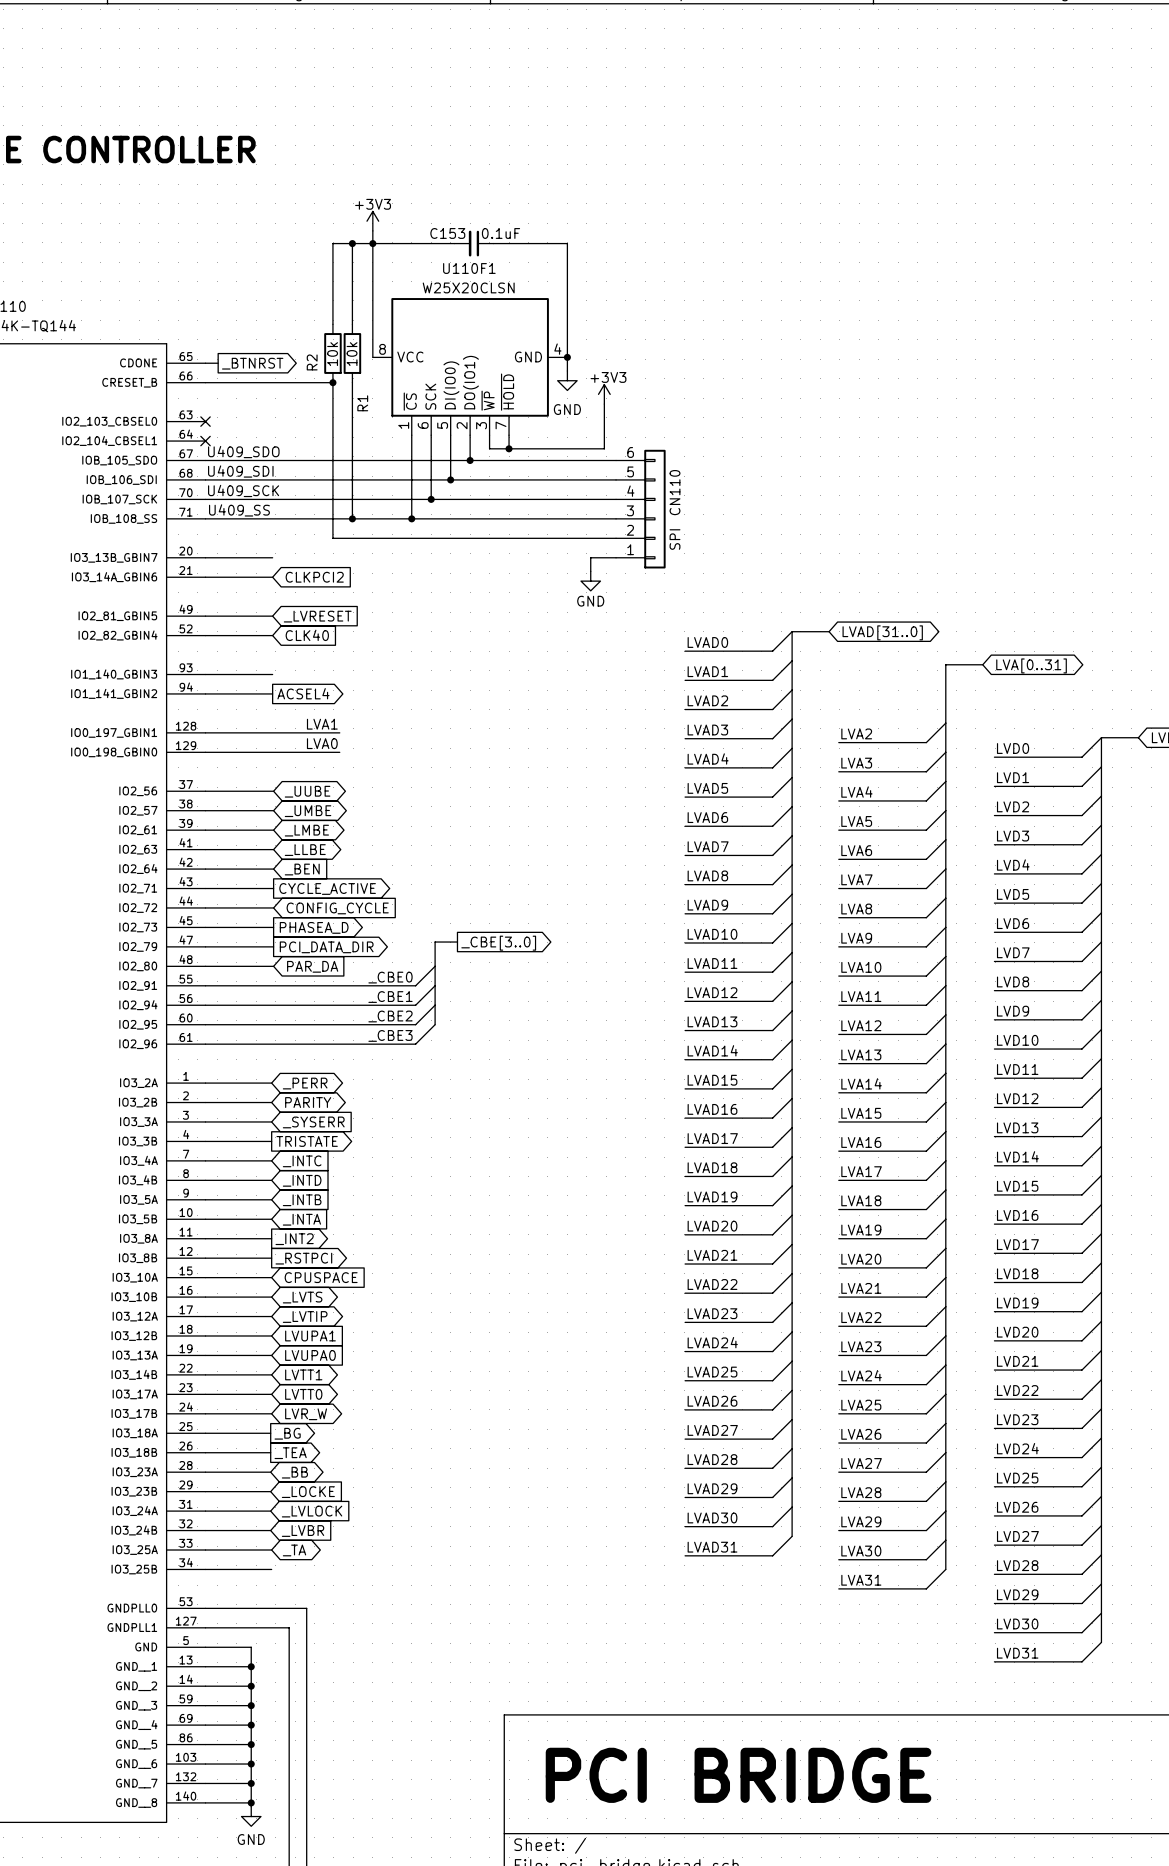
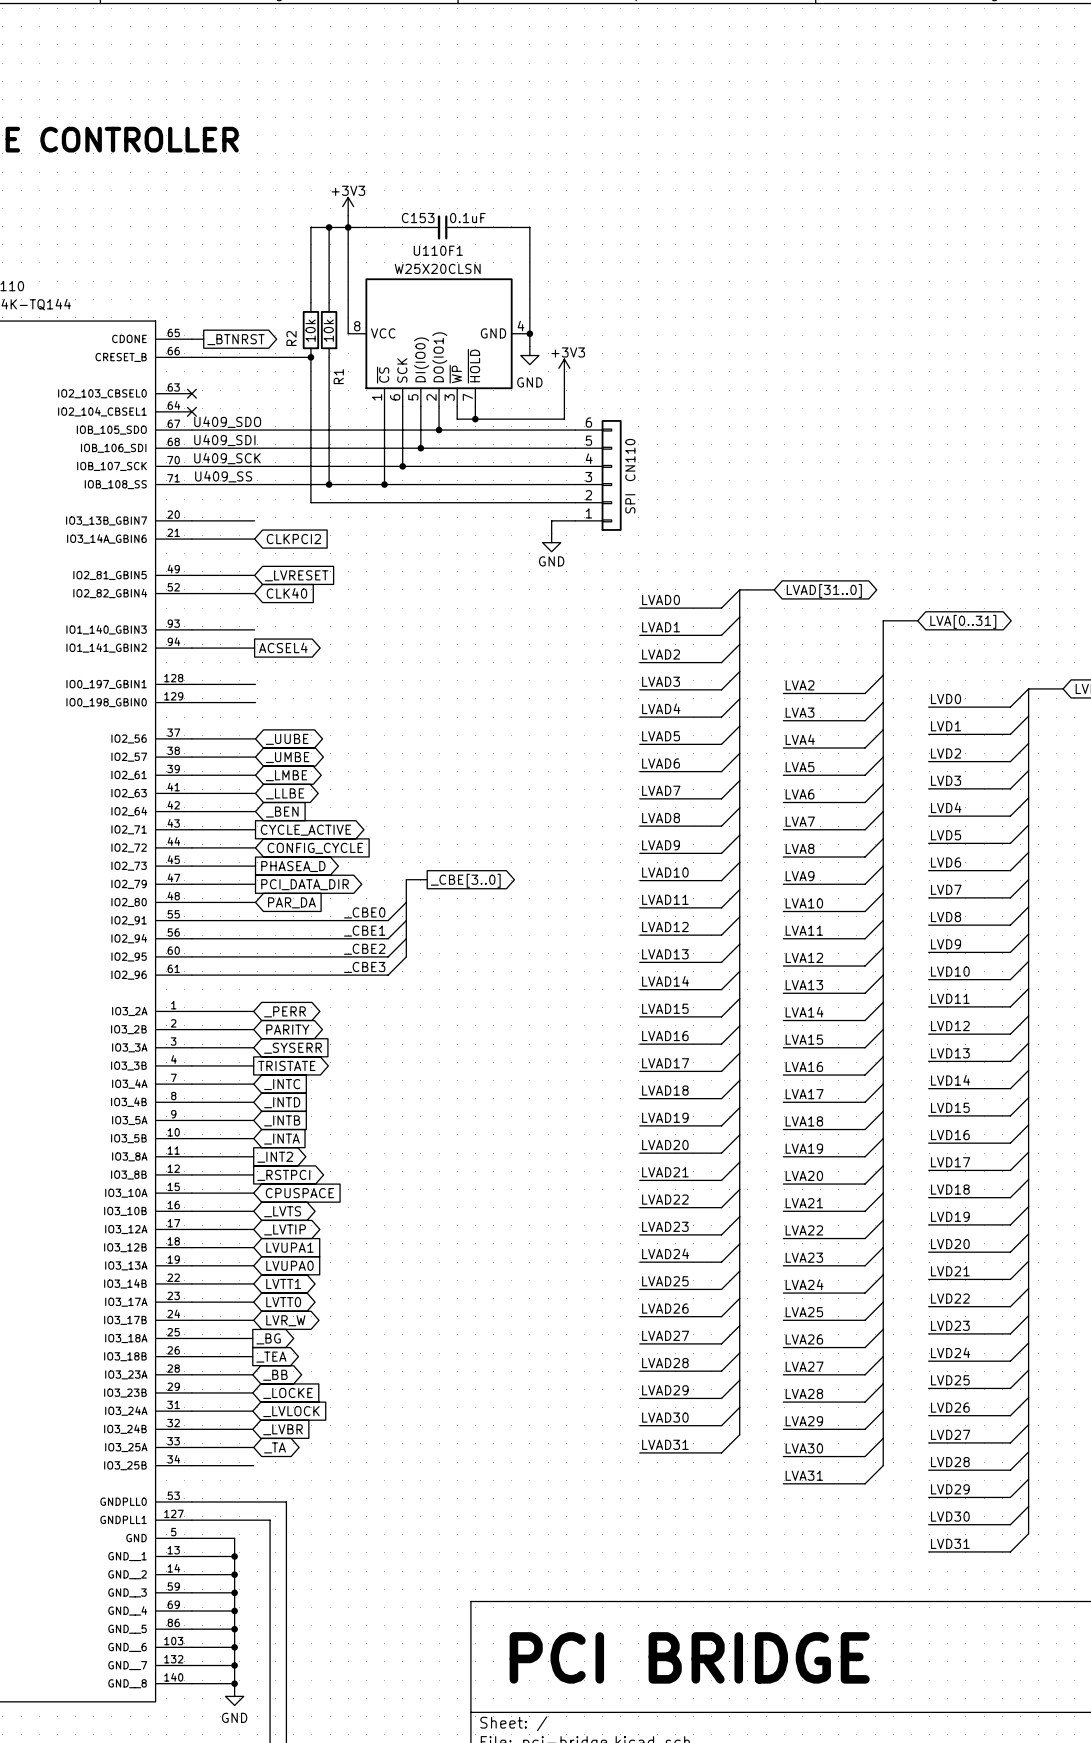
label: LVA1 (322, 724) -> none
wire: (273, 732) (339, 732) -> none
label: LVA0 (322, 743) -> none
wire: (273, 752) (339, 752) -> none

